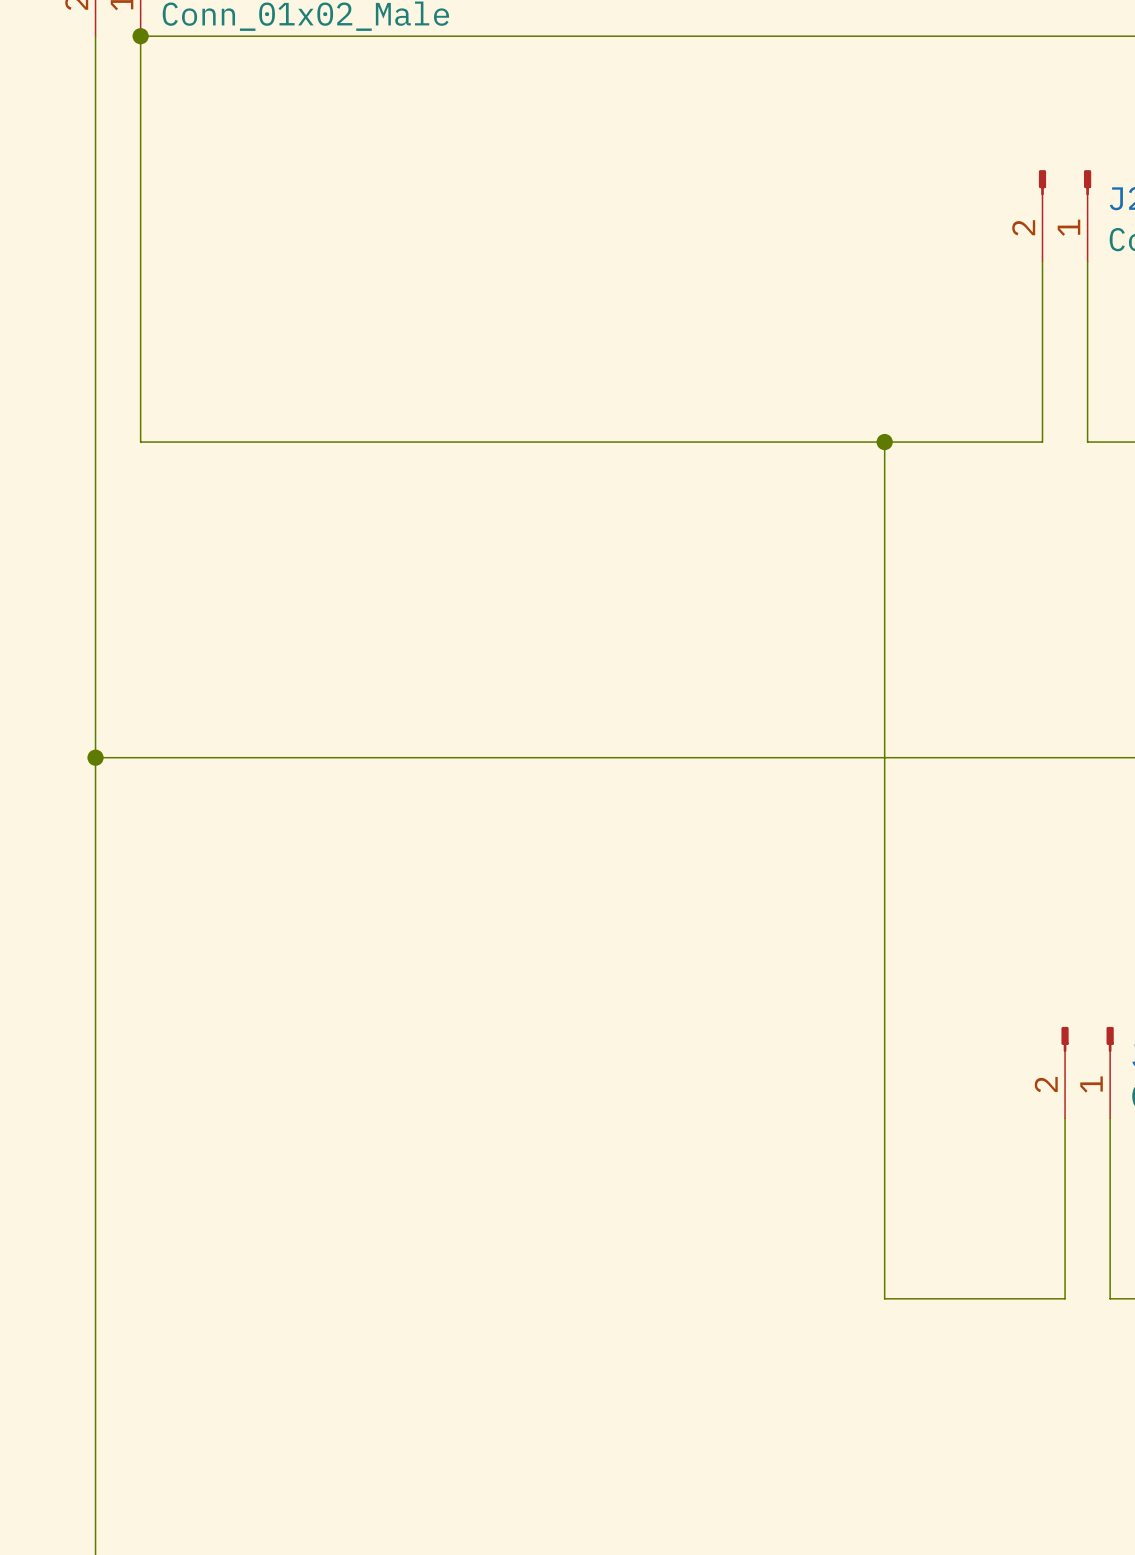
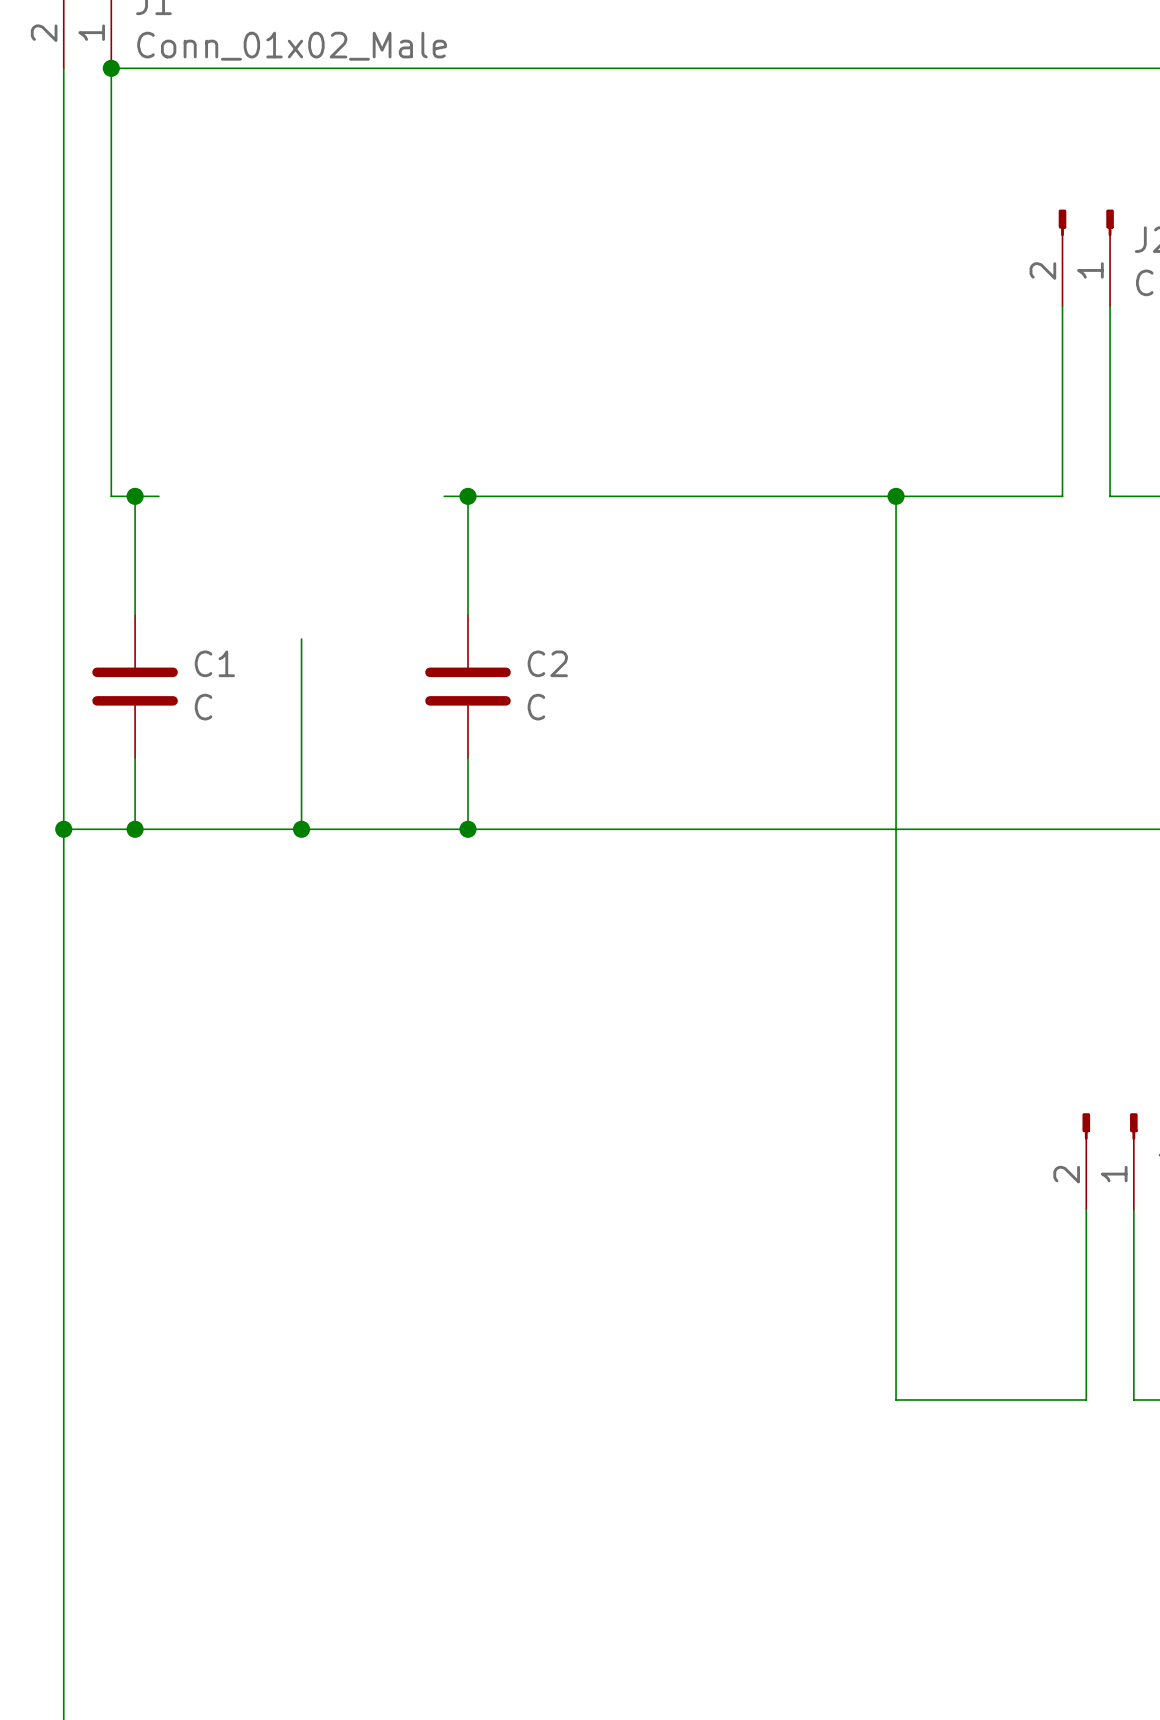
wire: none -> (135, 496) (135, 615)
junction: none -> (135, 496)
wire: (185, 442) (456, 442) -> none
wire: none -> (468, 496) (468, 615)
junction: none -> (468, 496)
wire: none -> (301, 639) (301, 829)
C1: none -> C (135, 686)
C2: none -> C (468, 686)
wire: none -> (135, 757) (135, 829)
wire: none -> (468, 757) (468, 829)
junction: none -> (135, 829)
junction: none -> (301, 829)
junction: none -> (468, 829)

